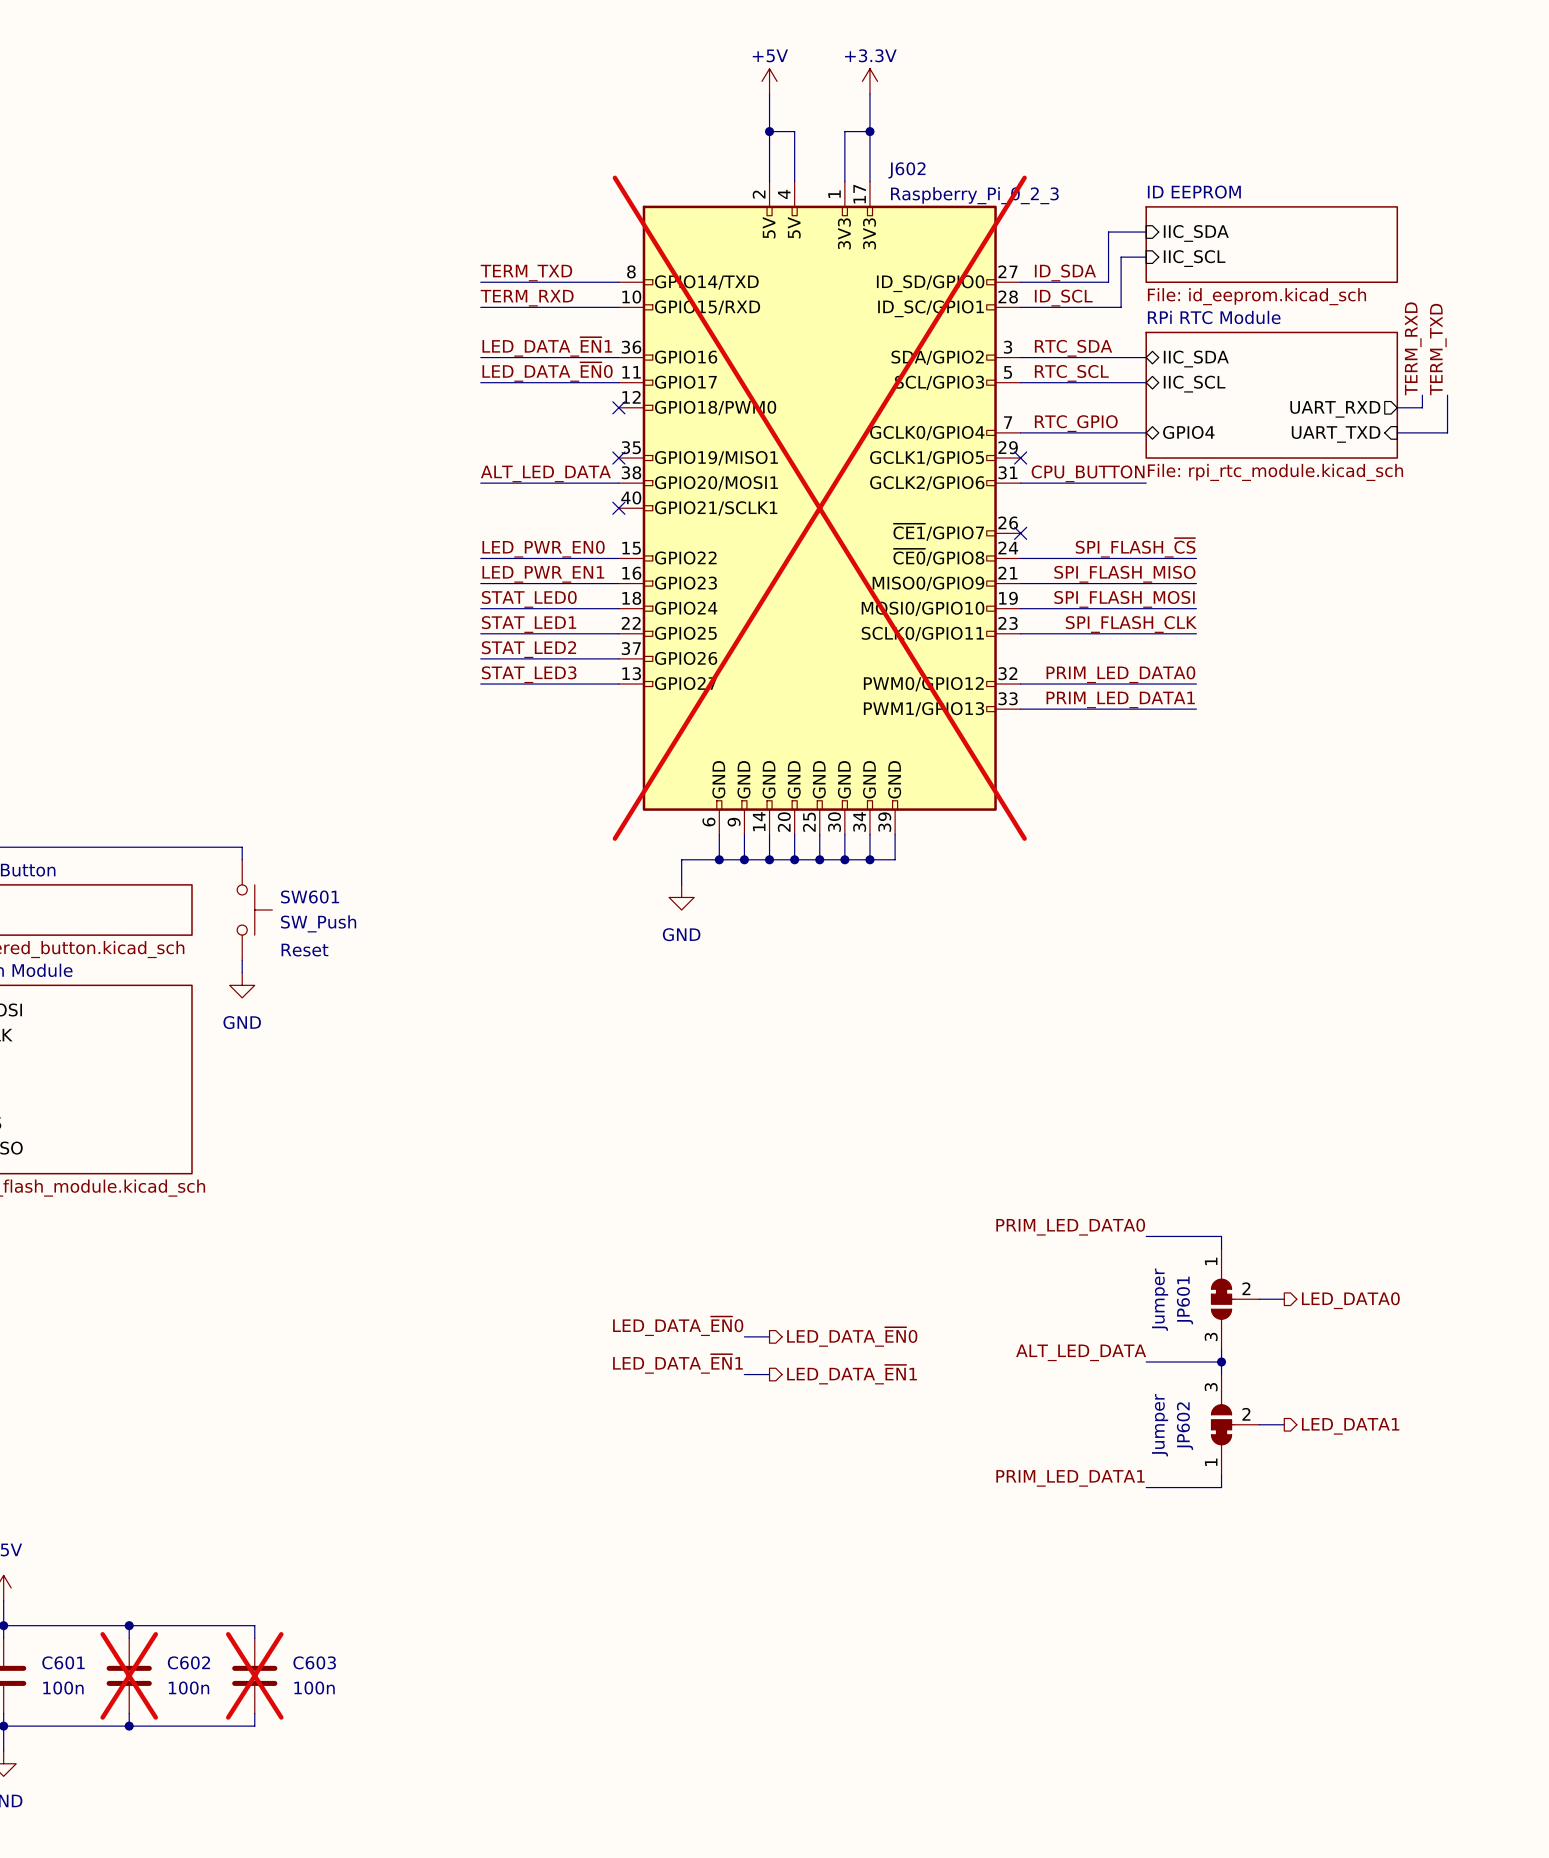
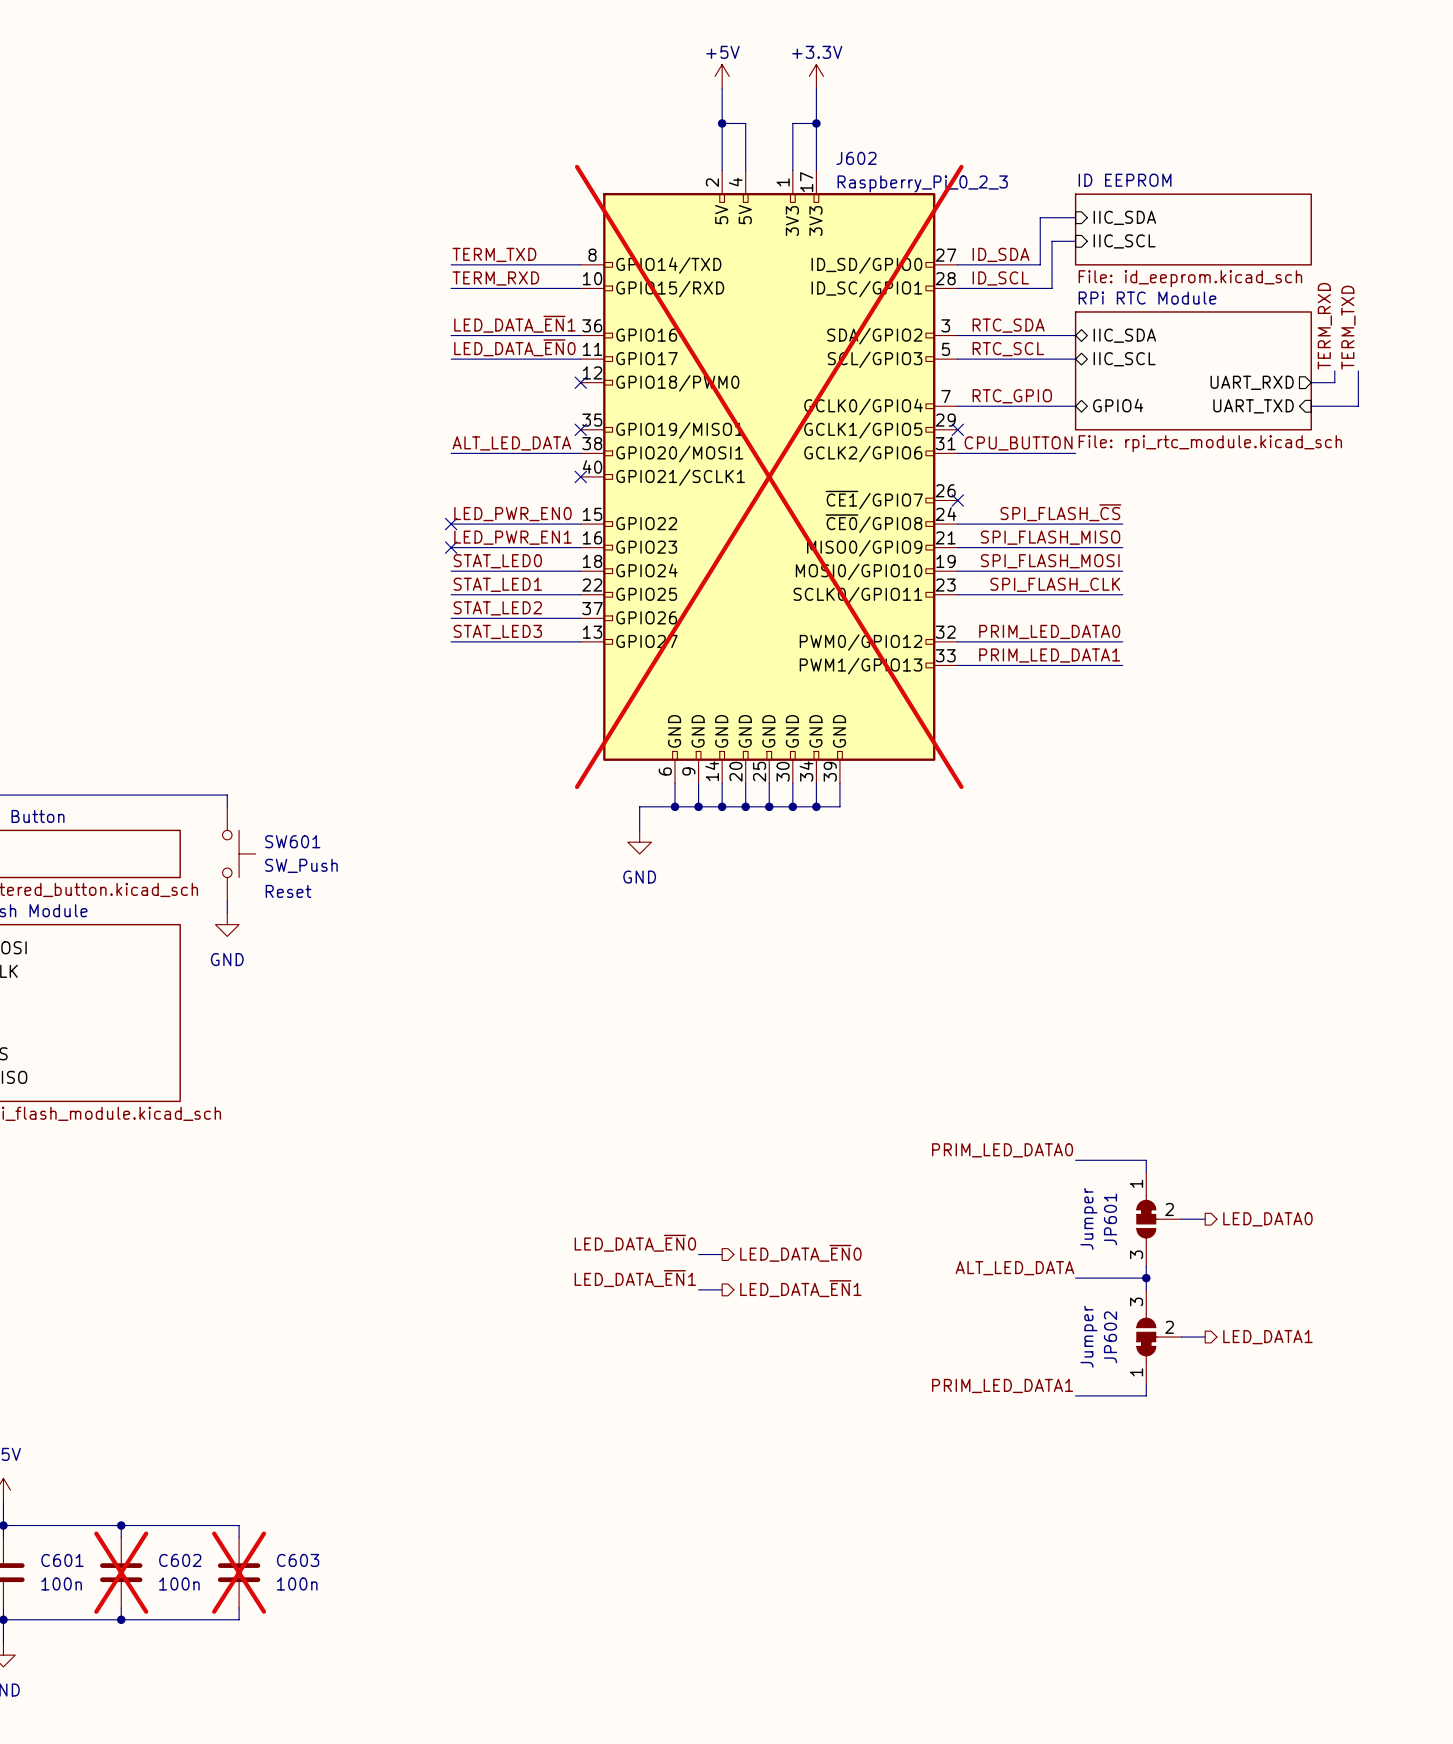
no-connect mark: none -> (451, 524)
no-connect mark: none -> (451, 547)

